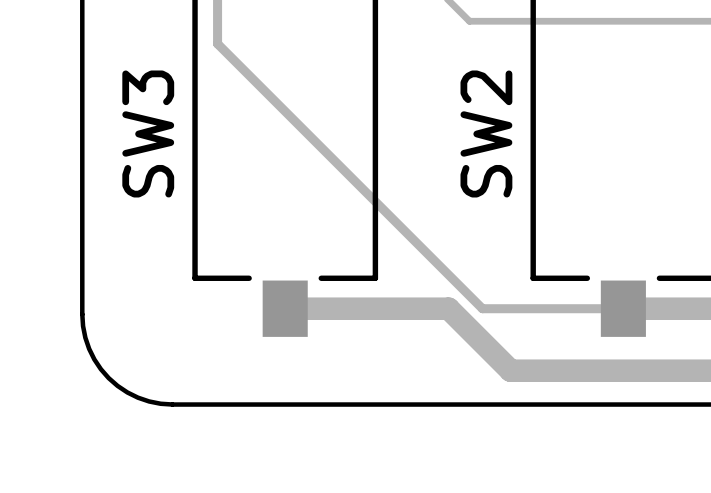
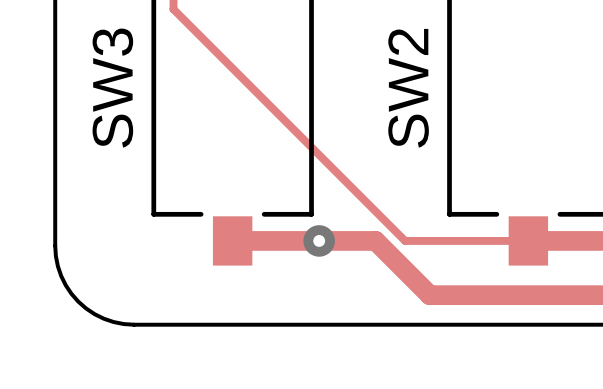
via: none -> (319, 240)

